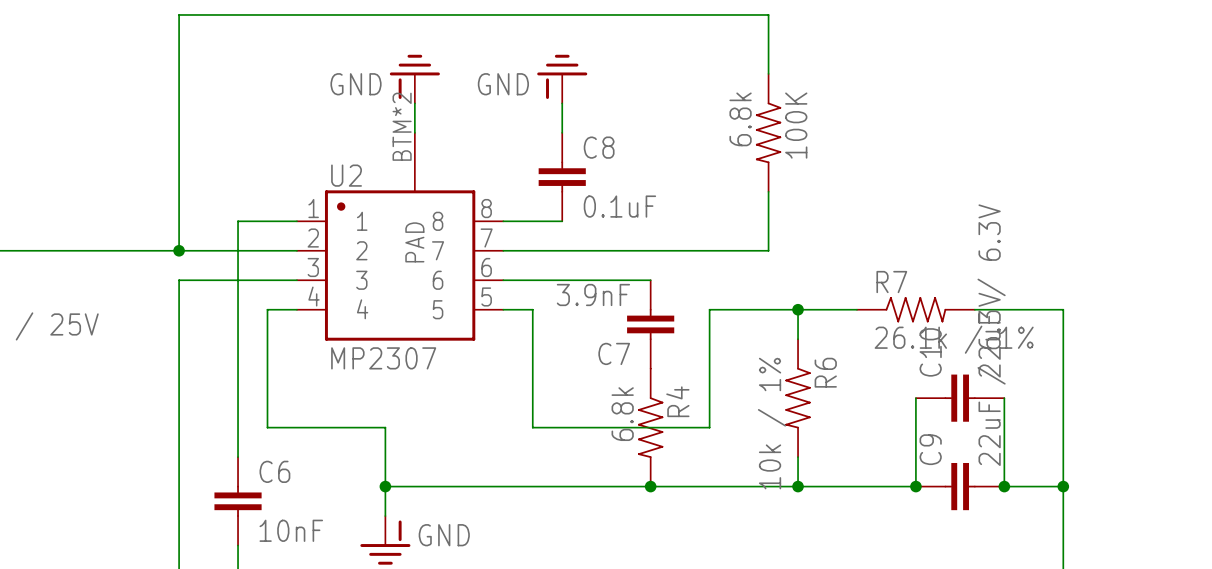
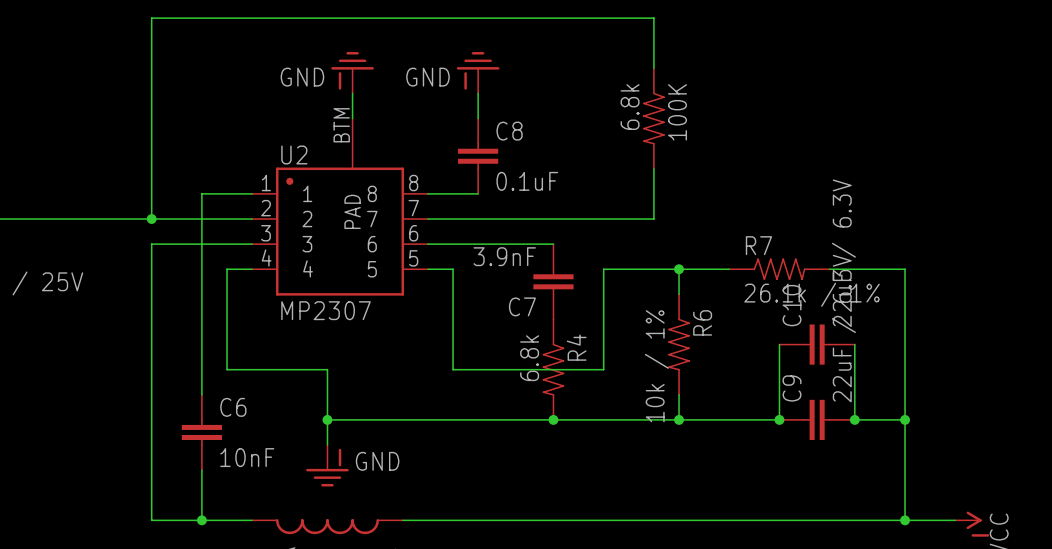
U2 pin number: BTM*2 (402, 126) -> BTM (341, 125)

